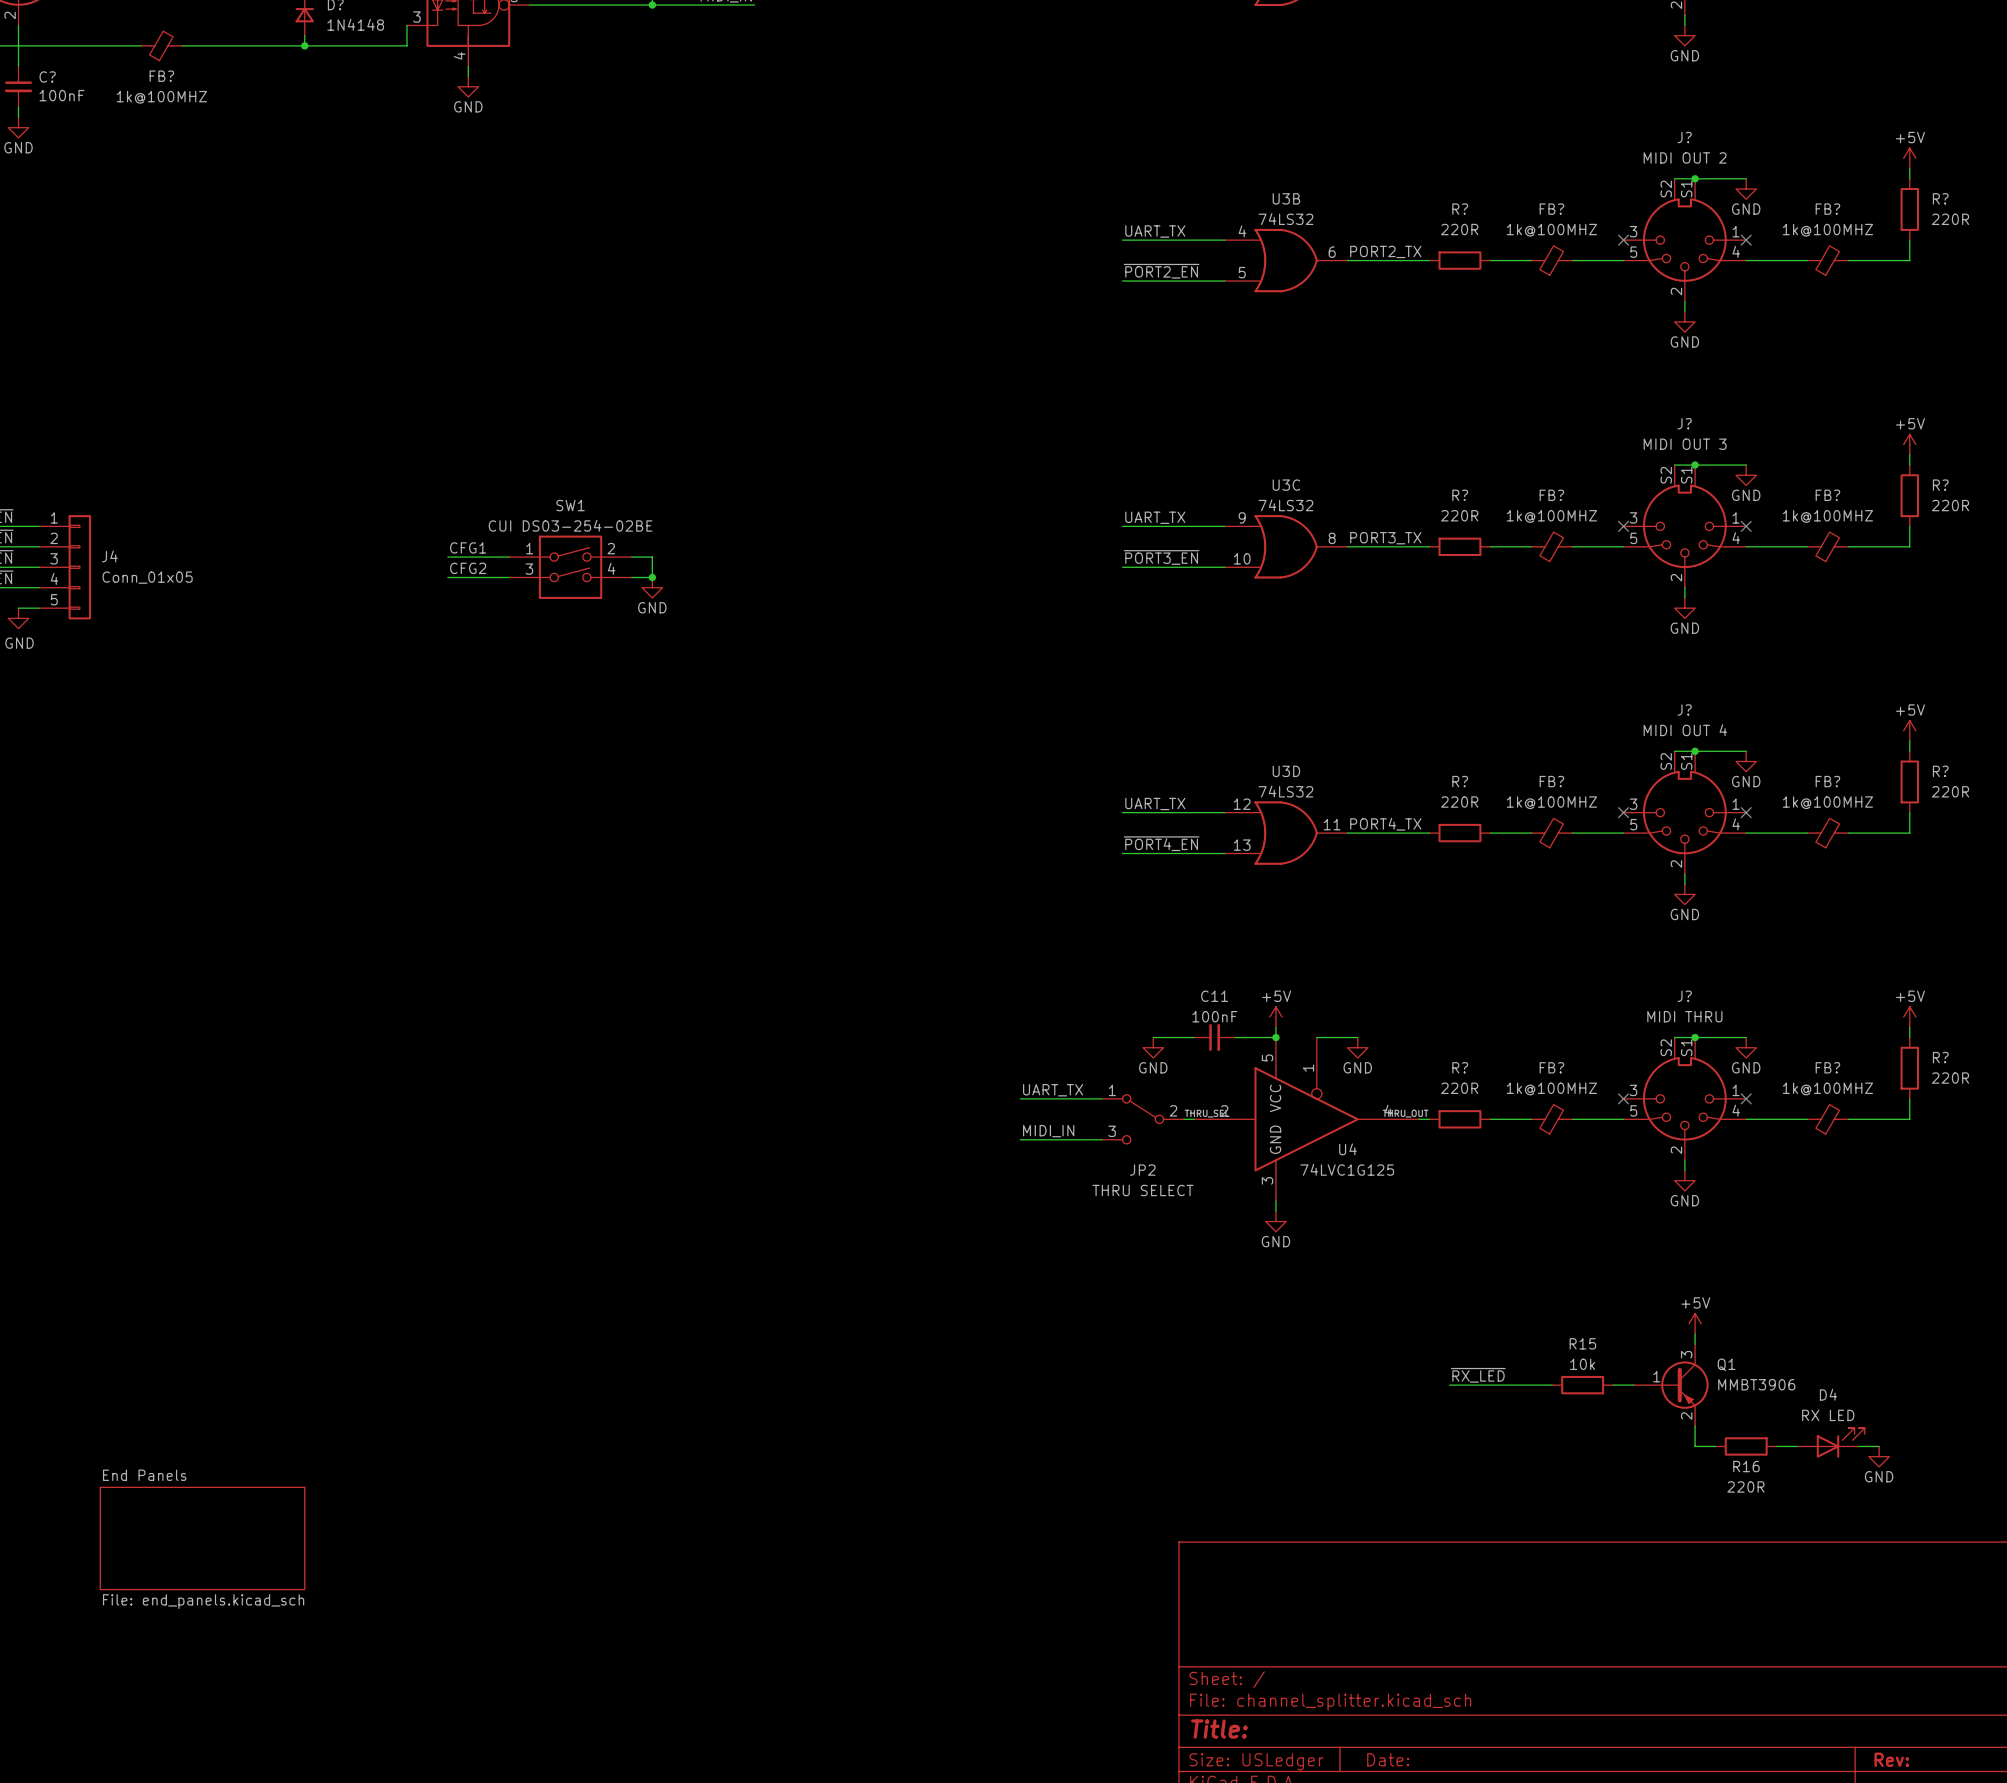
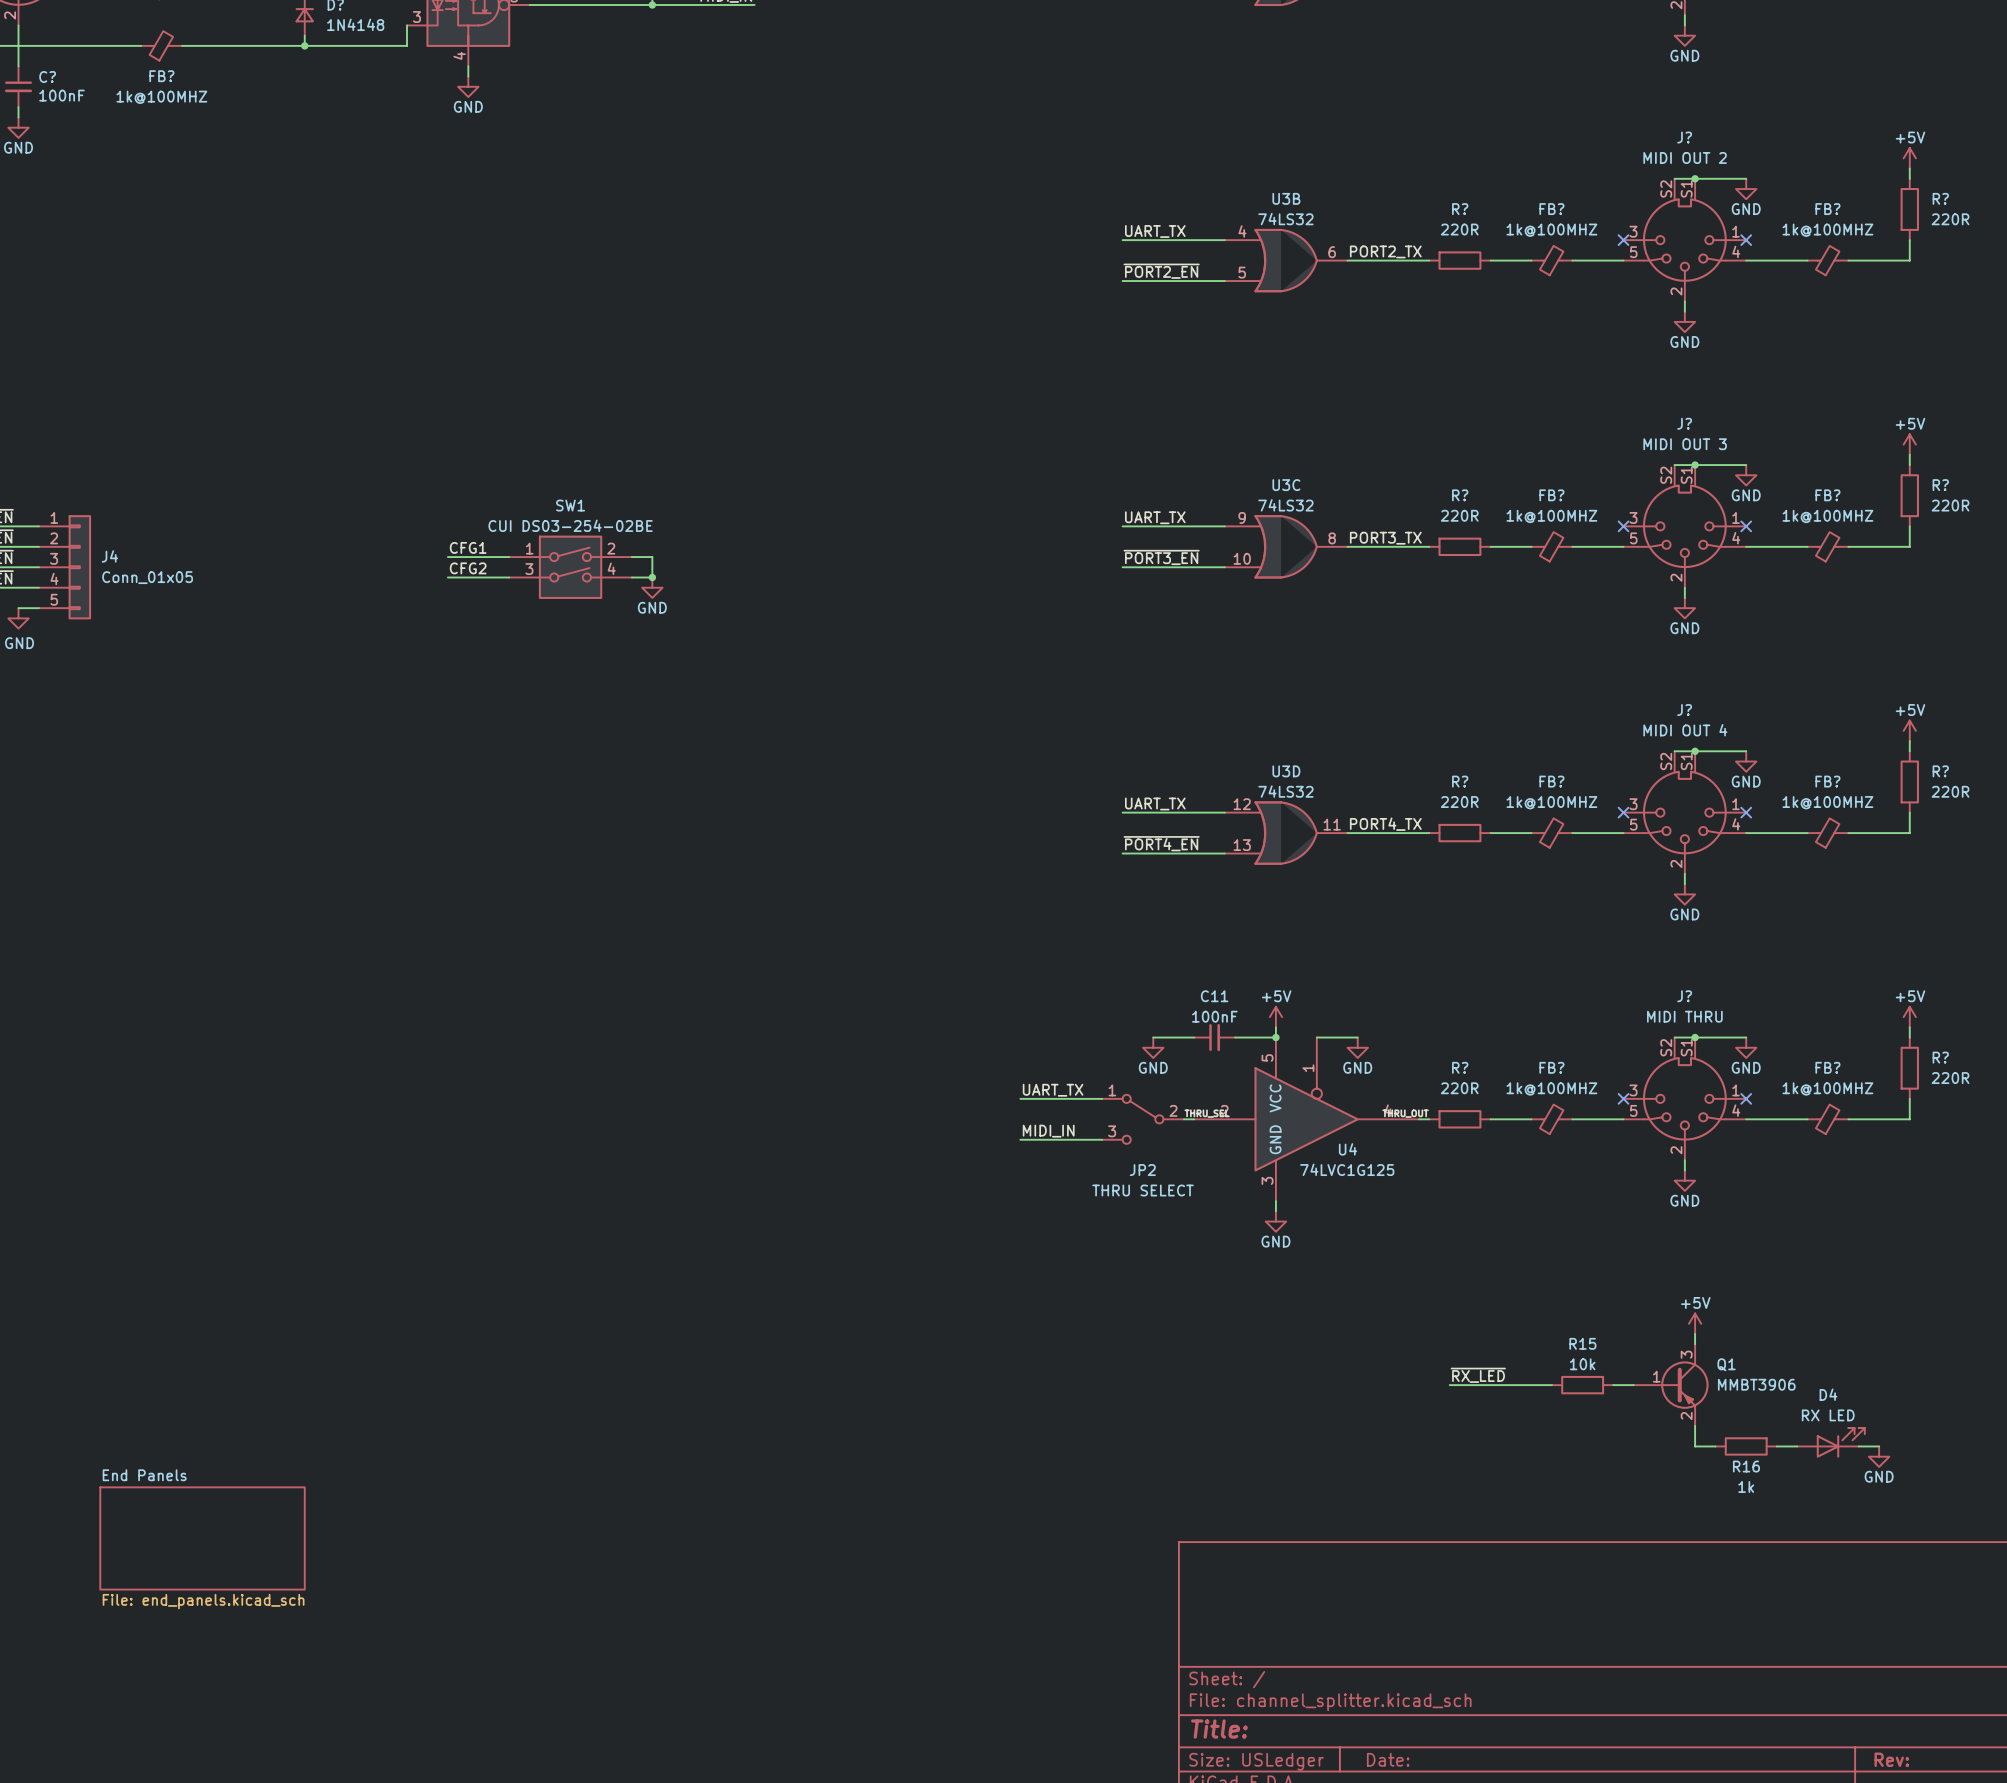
R16 value: 220R (1745, 1486) -> 1k (1746, 1486)

